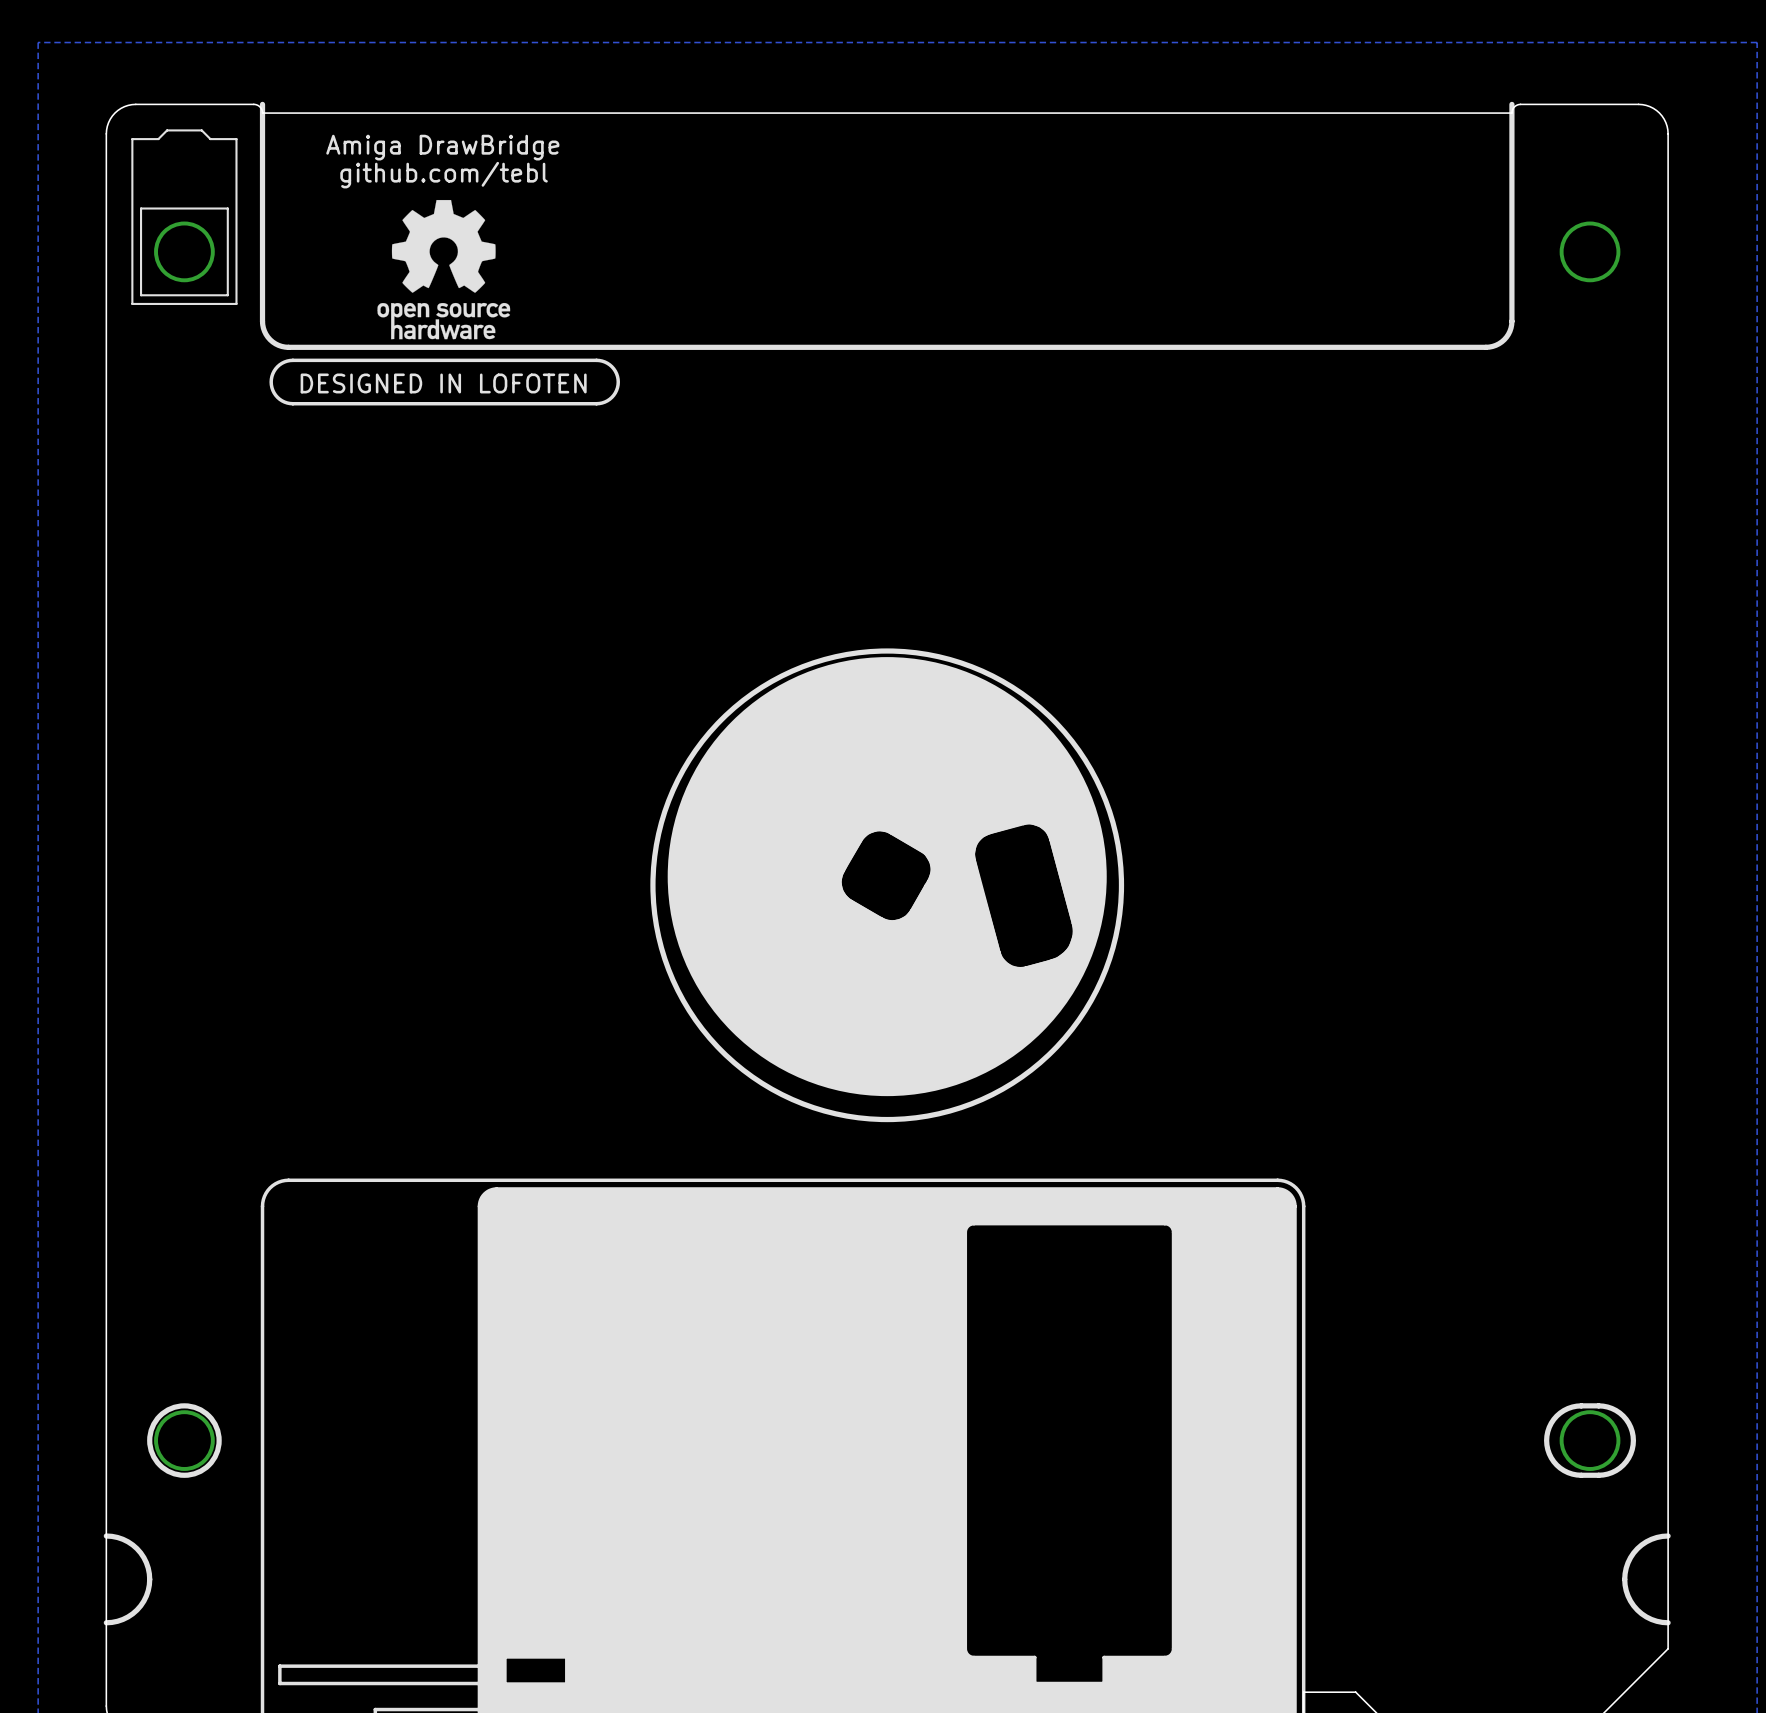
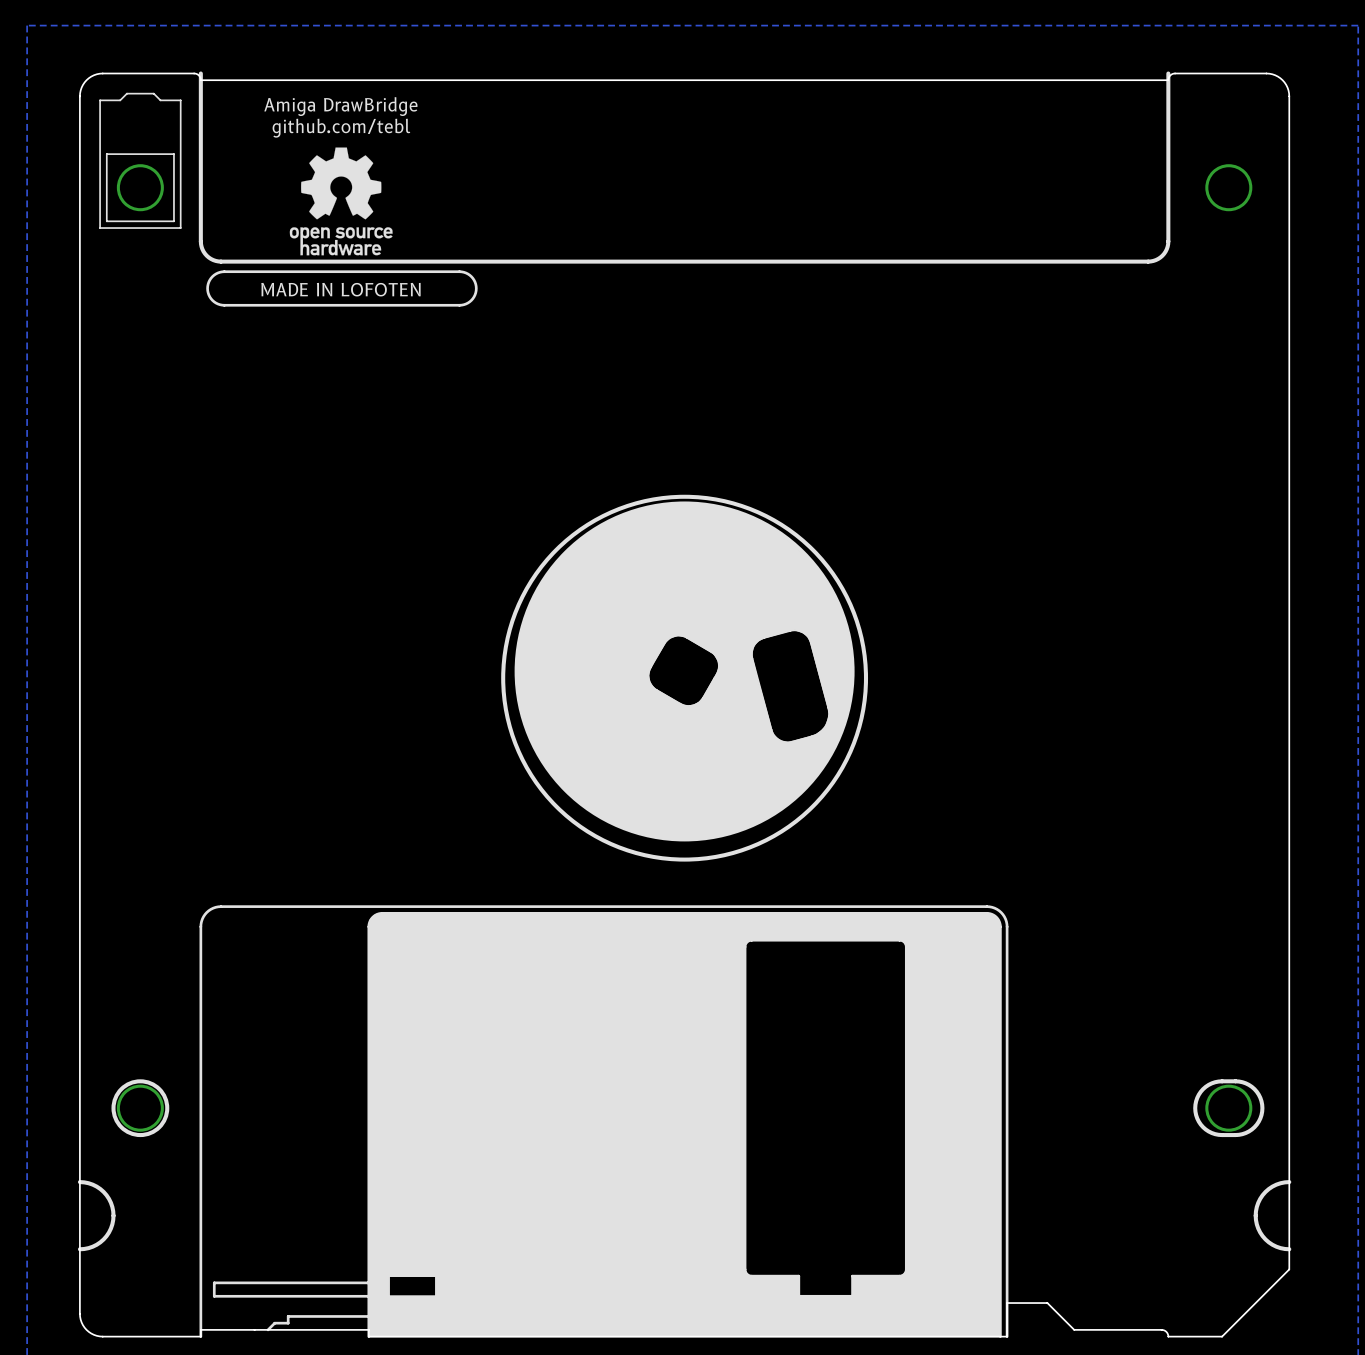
text: DESIGNED IN LOFOTEN (443, 383) -> MADE IN LOFOTEN (340, 289)

